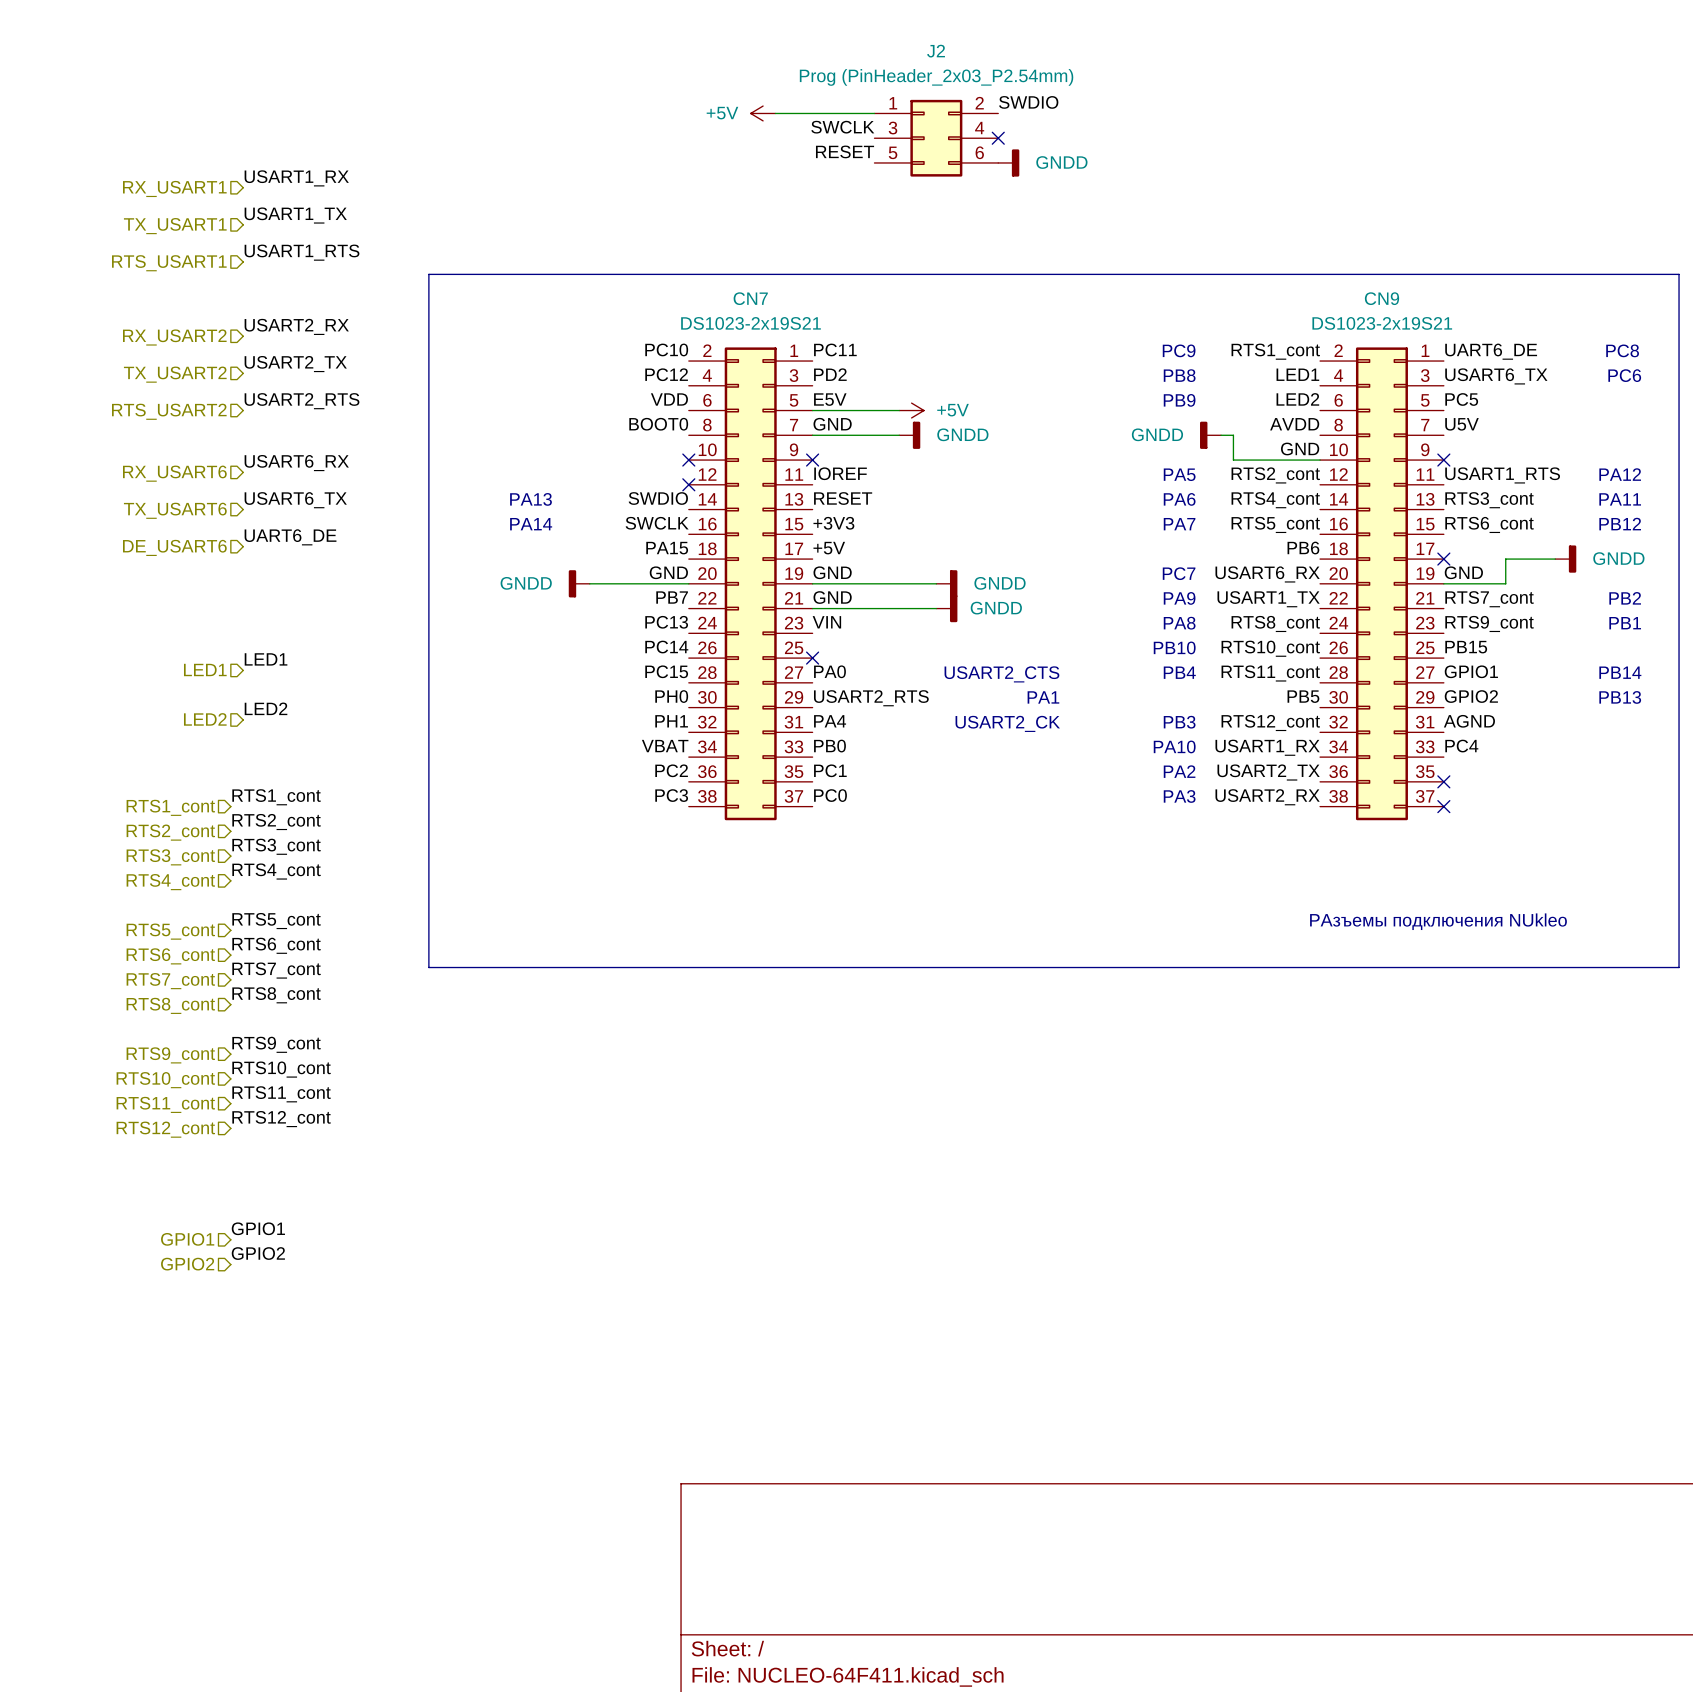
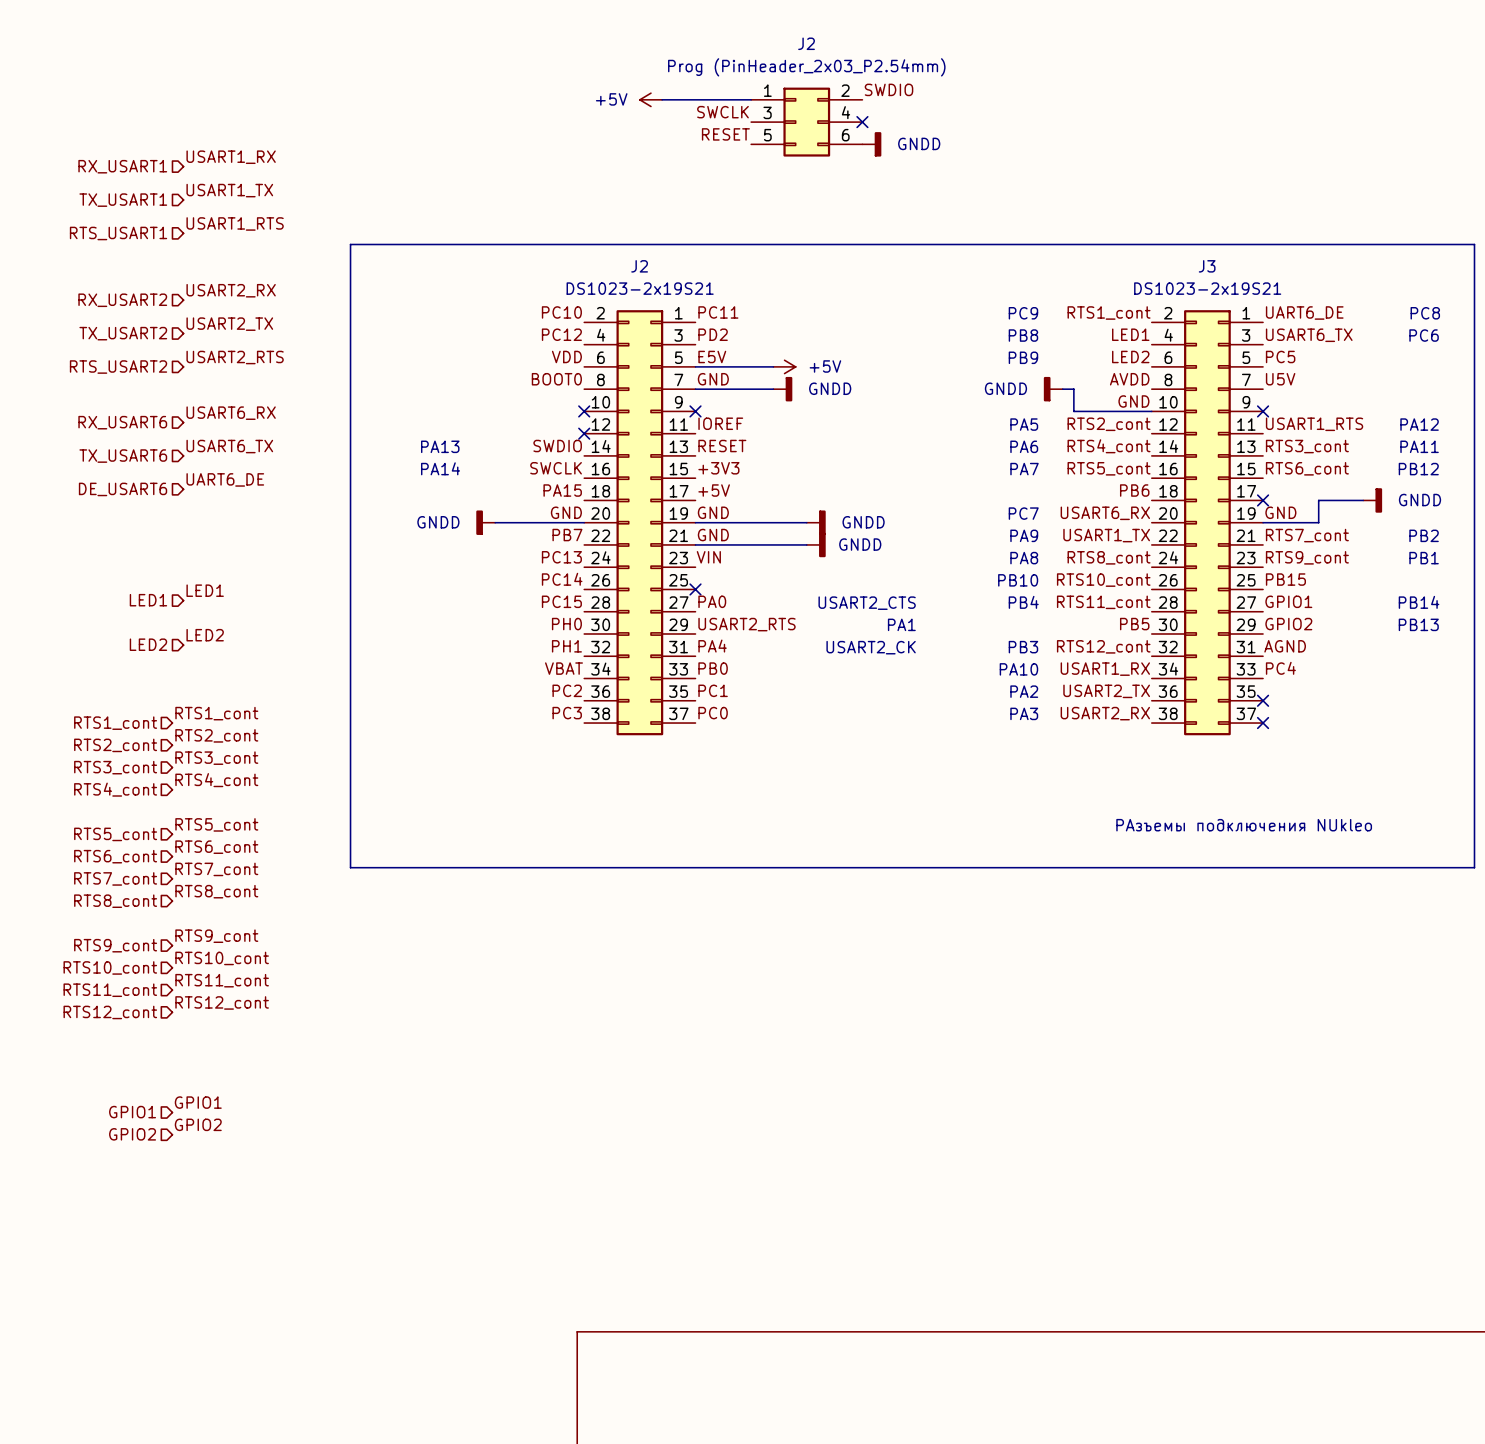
CN7 name: CN7 (750, 298) -> J2 (639, 266)
CN9 name: CN9 (1381, 298) -> J3 (1207, 266)

